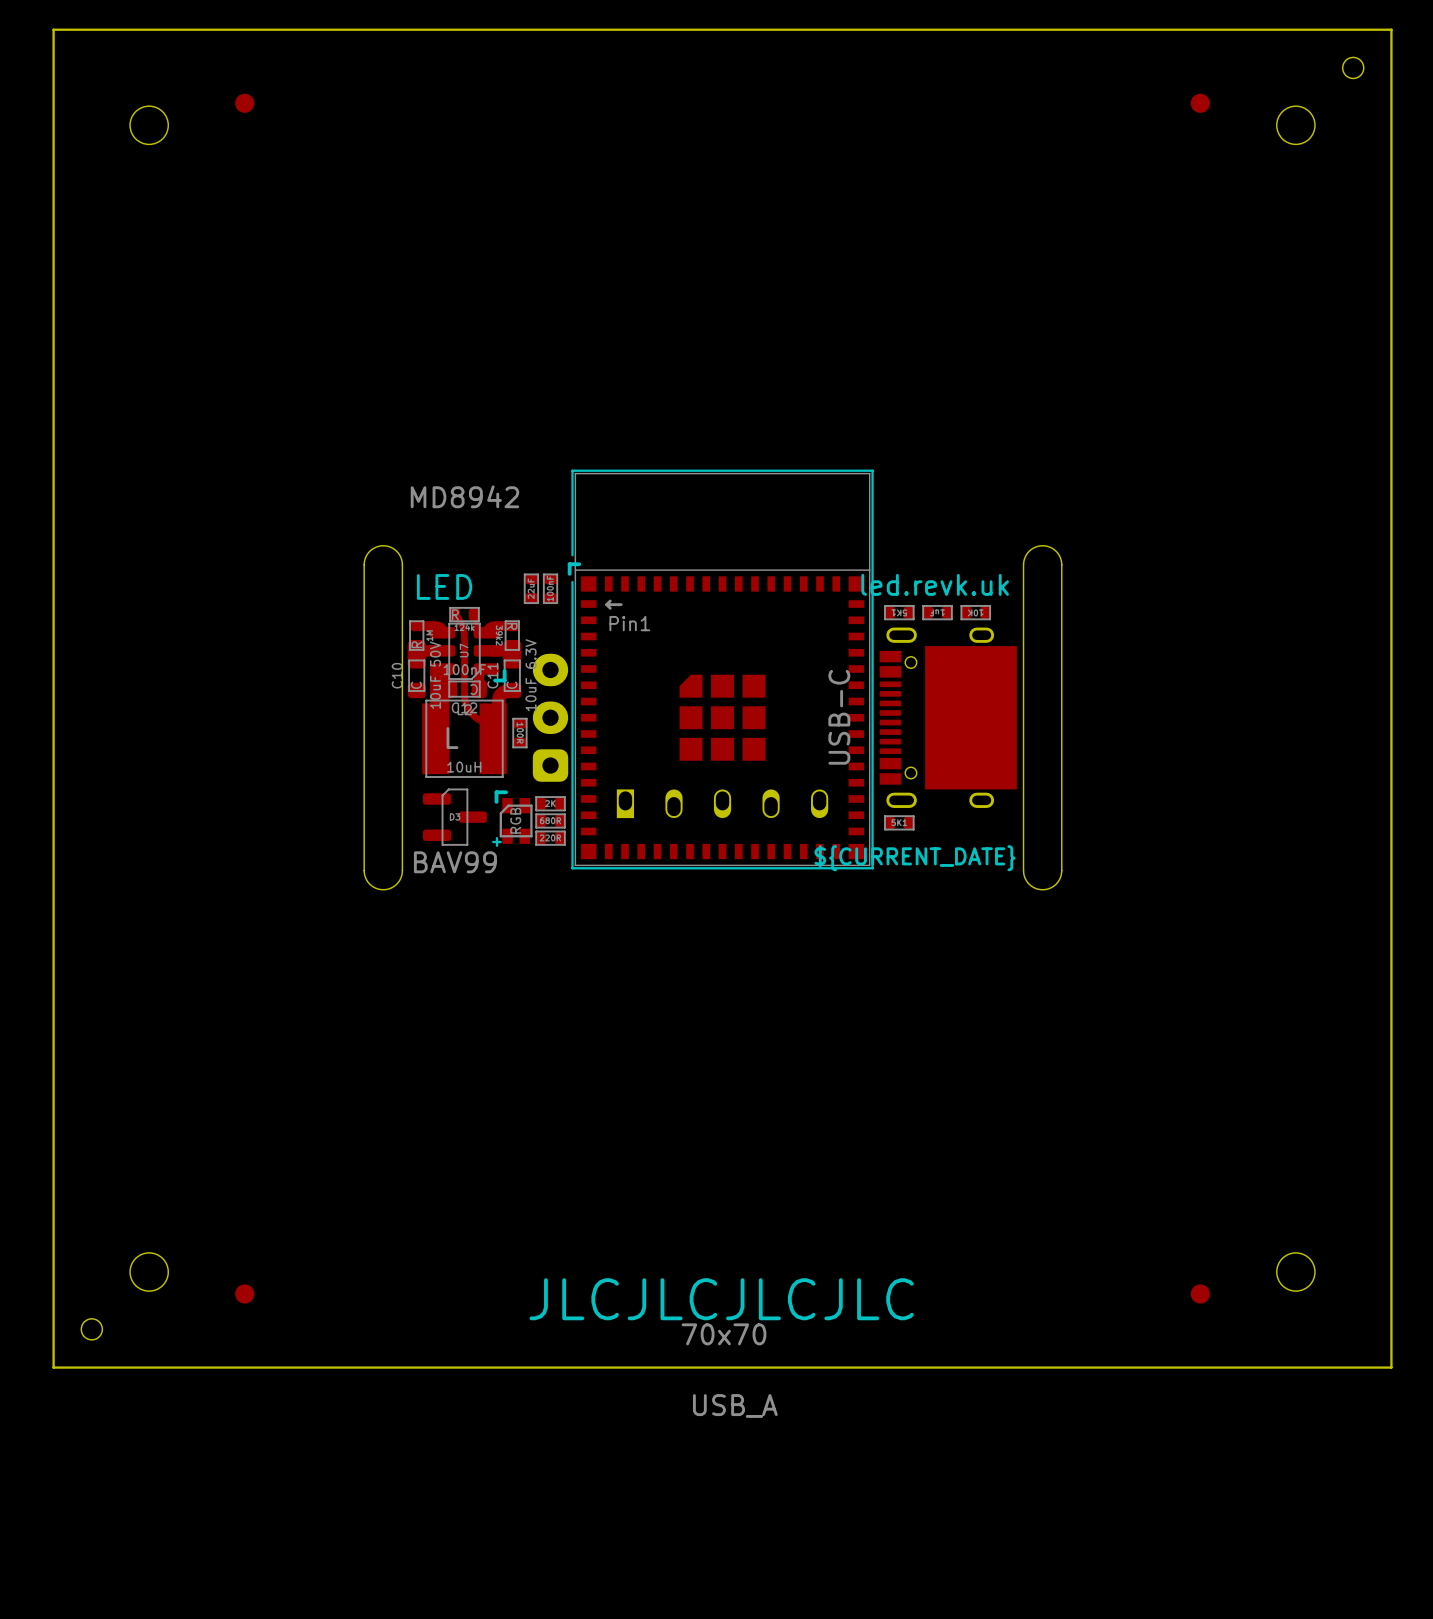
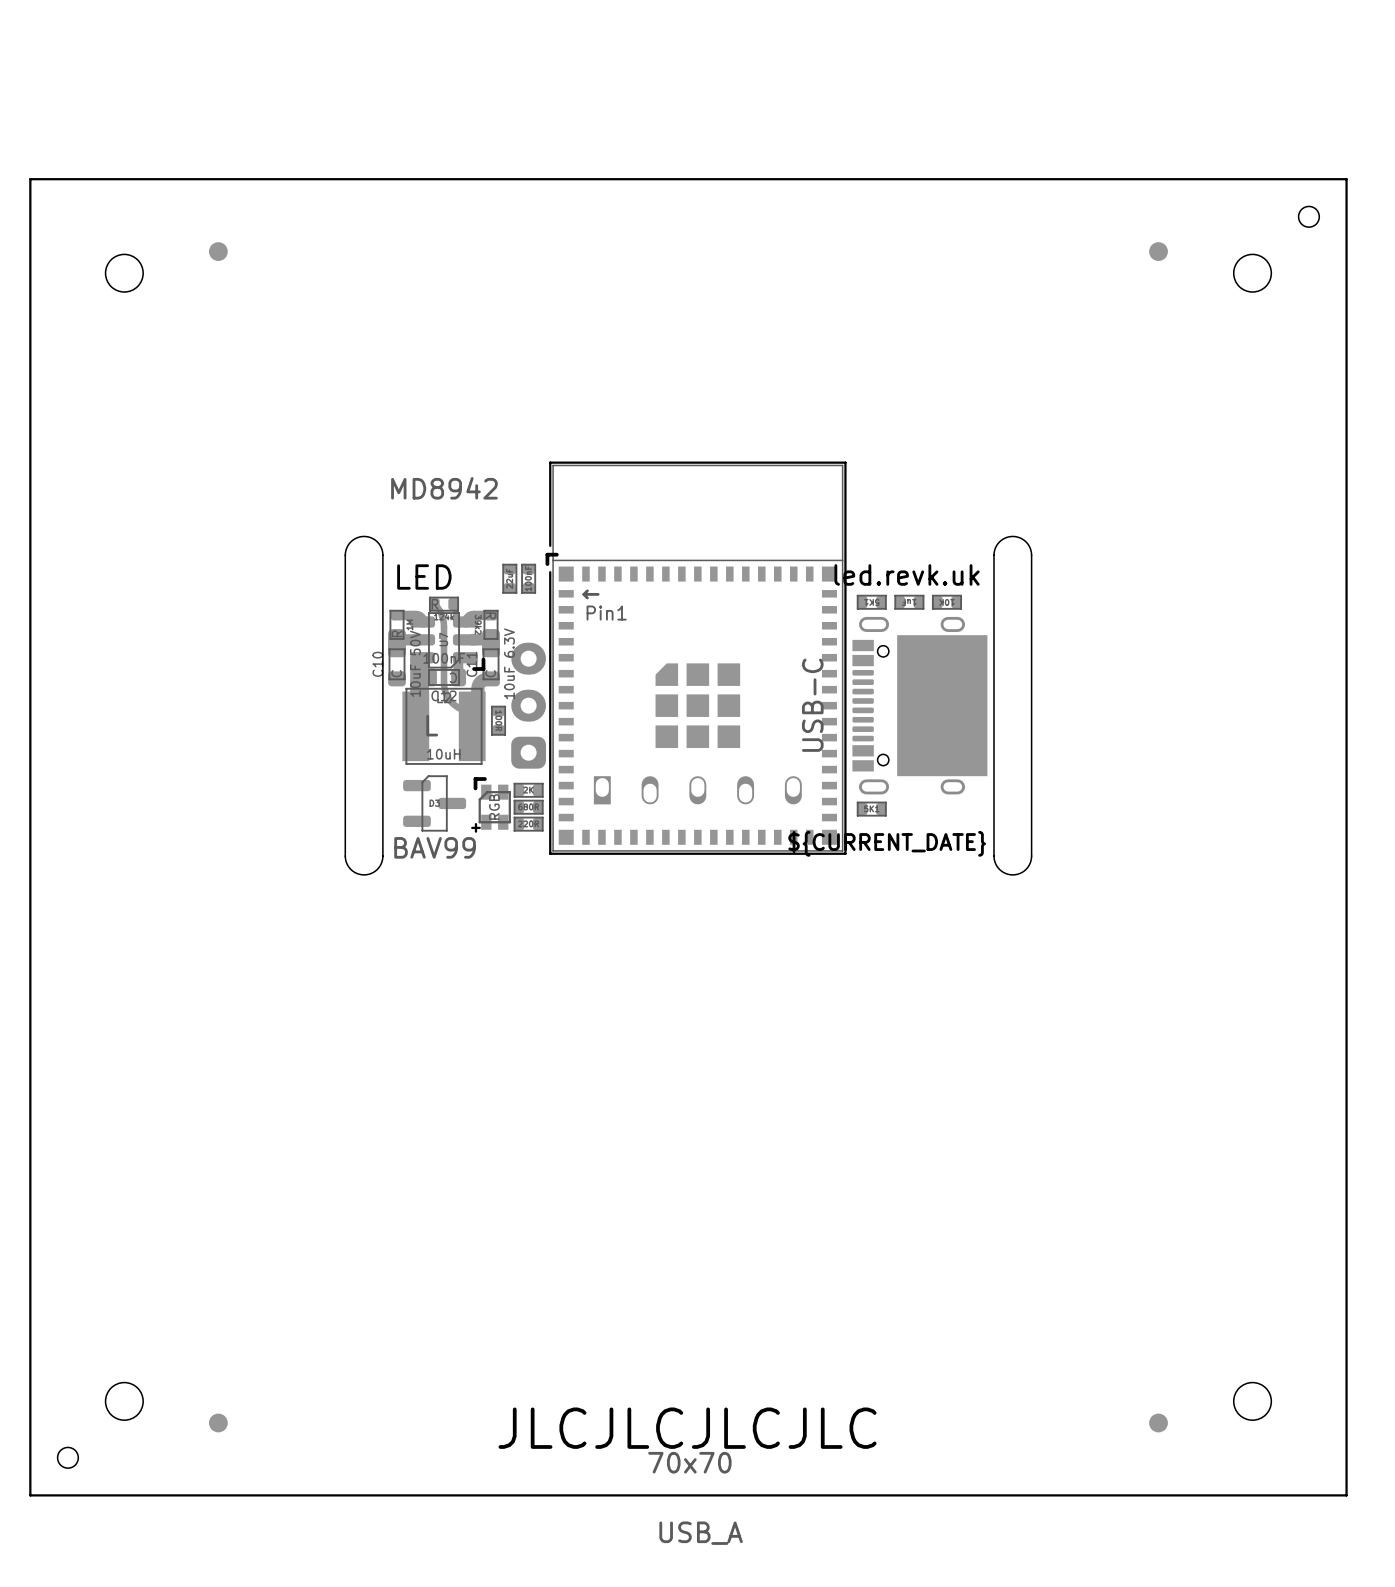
part position: (722, 698) -> (688, 837)
text position: USB_A (735, 1405) -> USB_A (701, 1533)

